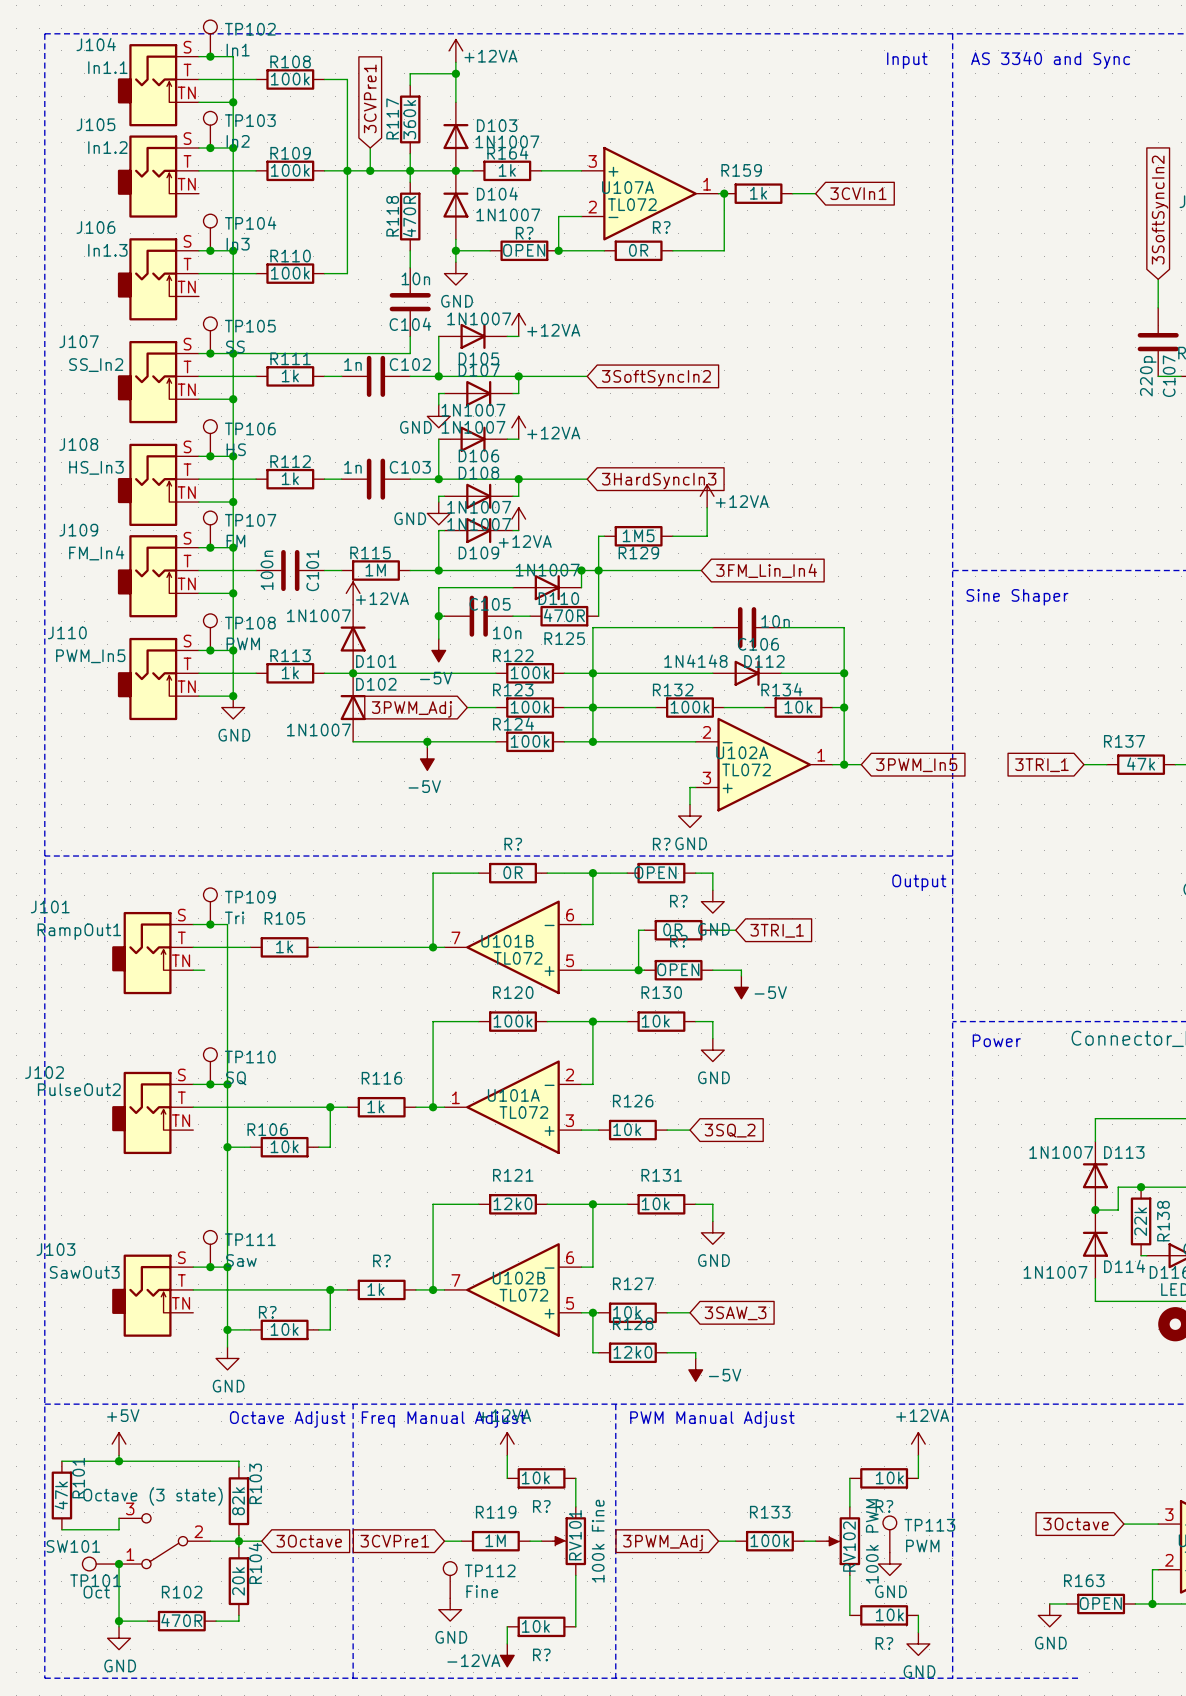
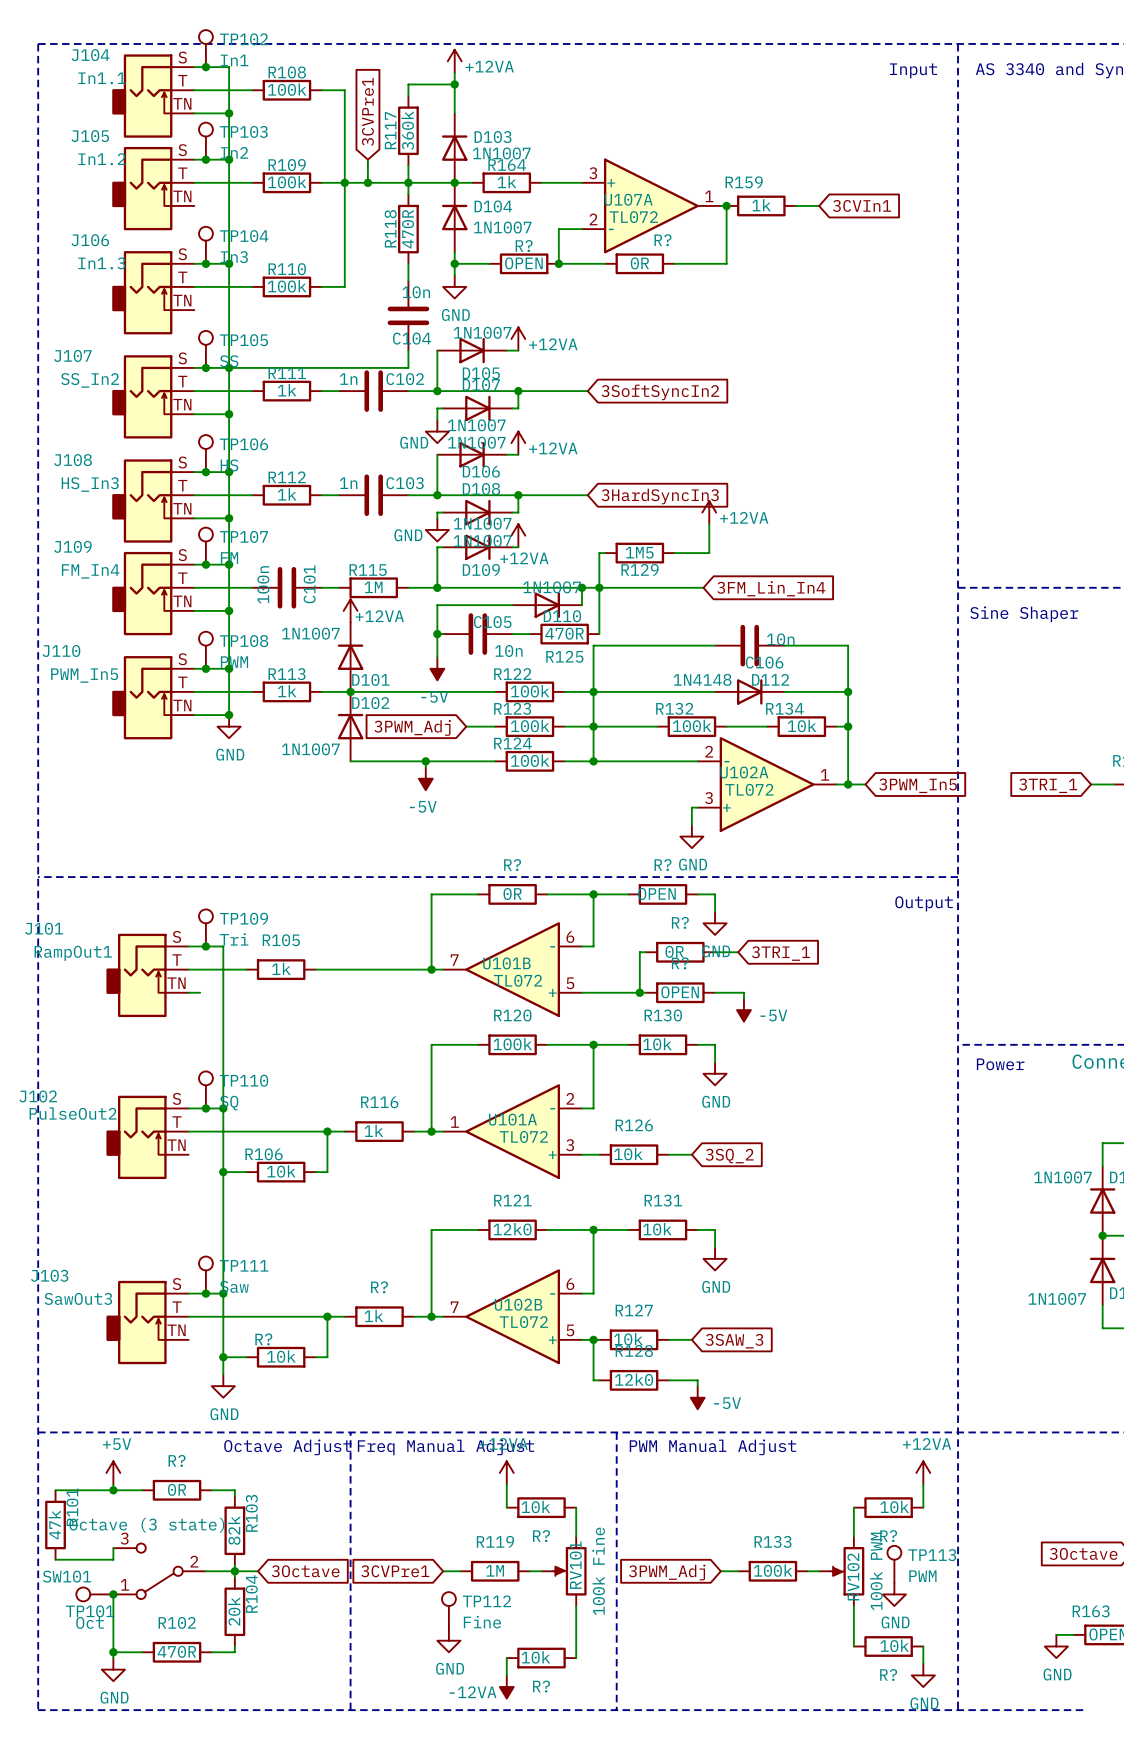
wire: (147, 1461) (216, 1461) -> none
R?: none -> 0R (177, 1490)

